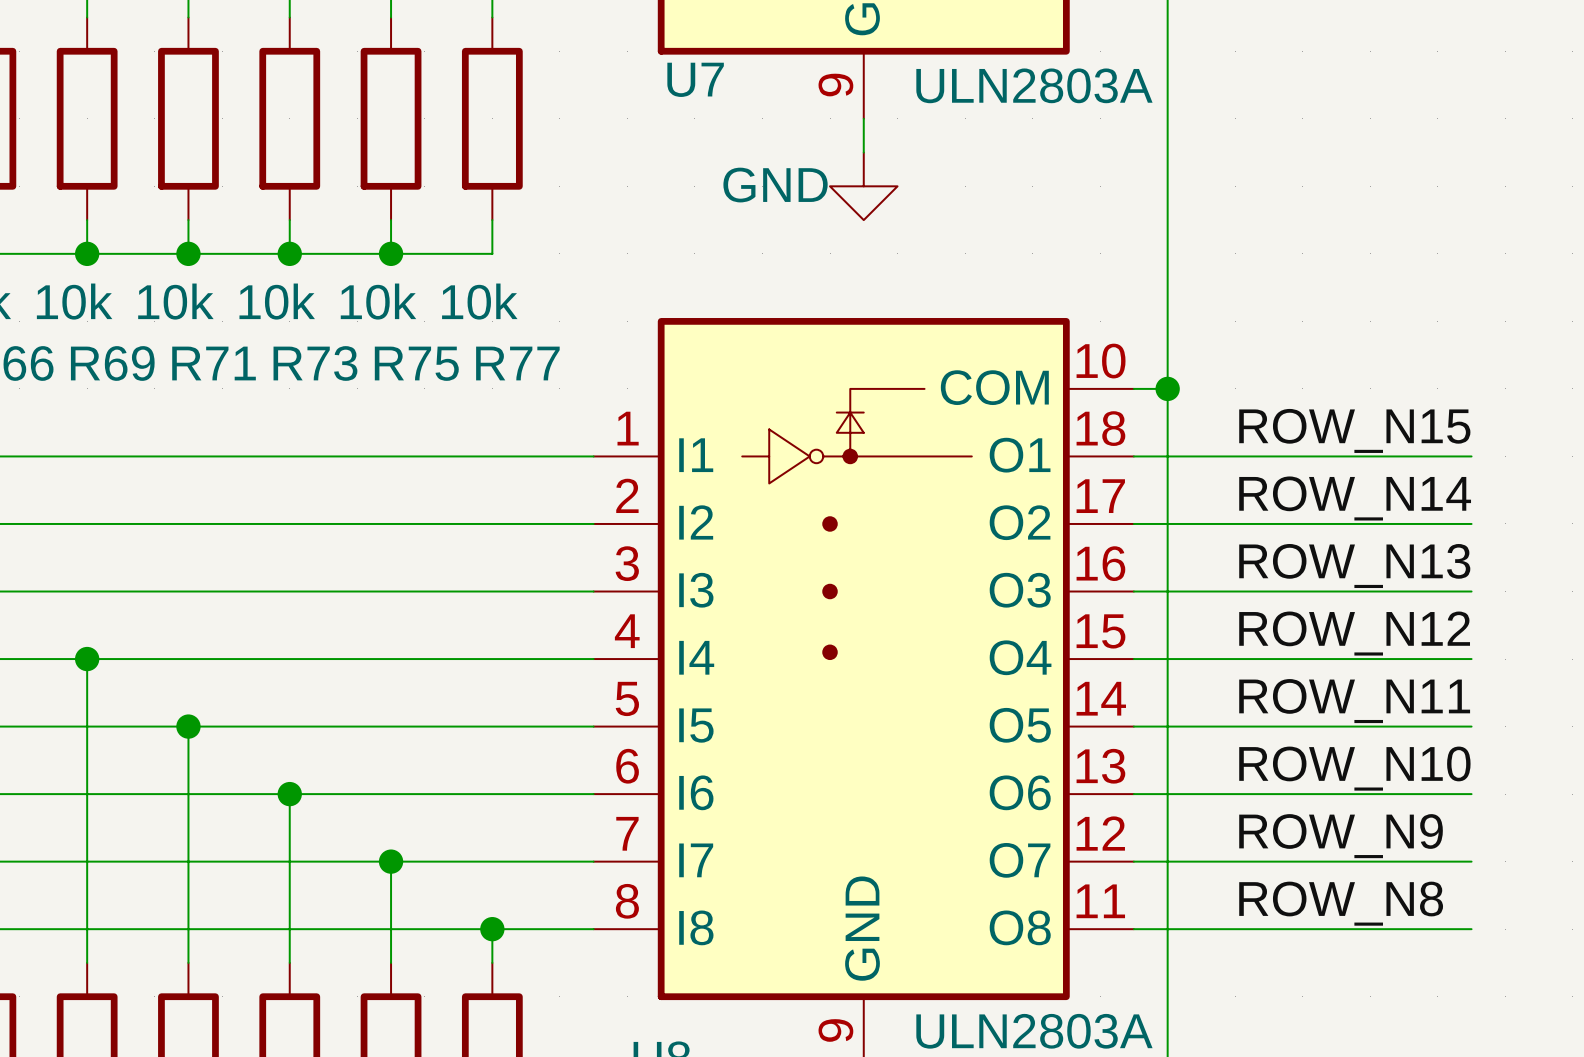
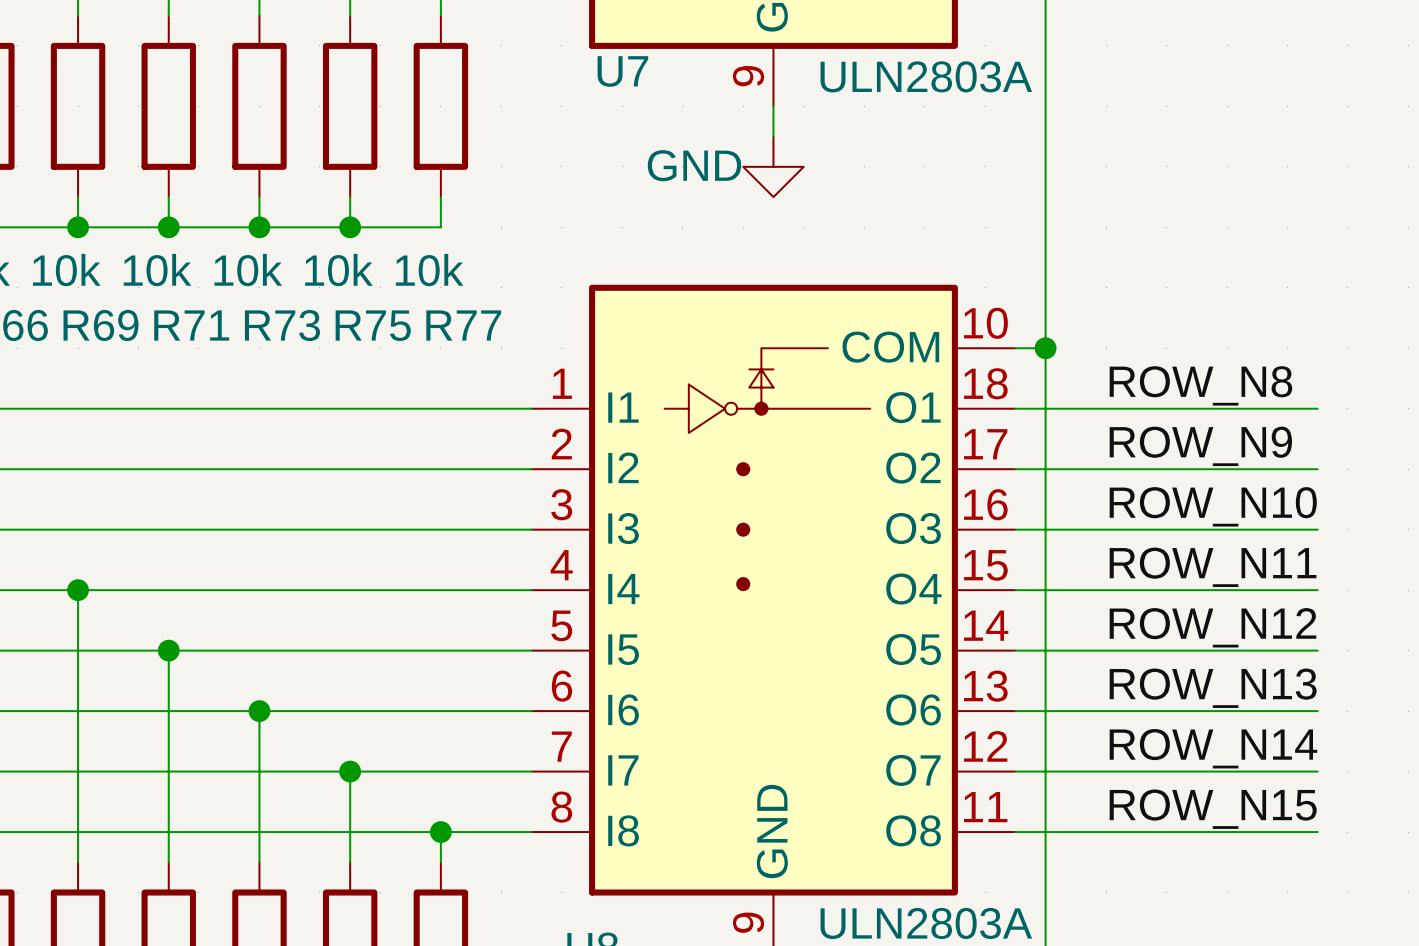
label: ROW_N15 (1354, 430) -> ROW_N8 (1200, 385)
label: ROW_N14 (1355, 498) -> ROW_N9 (1200, 446)
label: ROW_N13 (1354, 566) -> ROW_N10 (1213, 506)
label: ROW_N12 (1354, 633) -> ROW_N11 (1213, 567)
label: ROW_N11 (1354, 701) -> ROW_N12 (1213, 627)
label: ROW_N10 (1354, 768) -> ROW_N13 (1213, 688)
label: ROW_N9 (1341, 836) -> ROW_N14 (1213, 748)
label: ROW_N8 (1341, 903) -> ROW_N15 (1213, 809)

